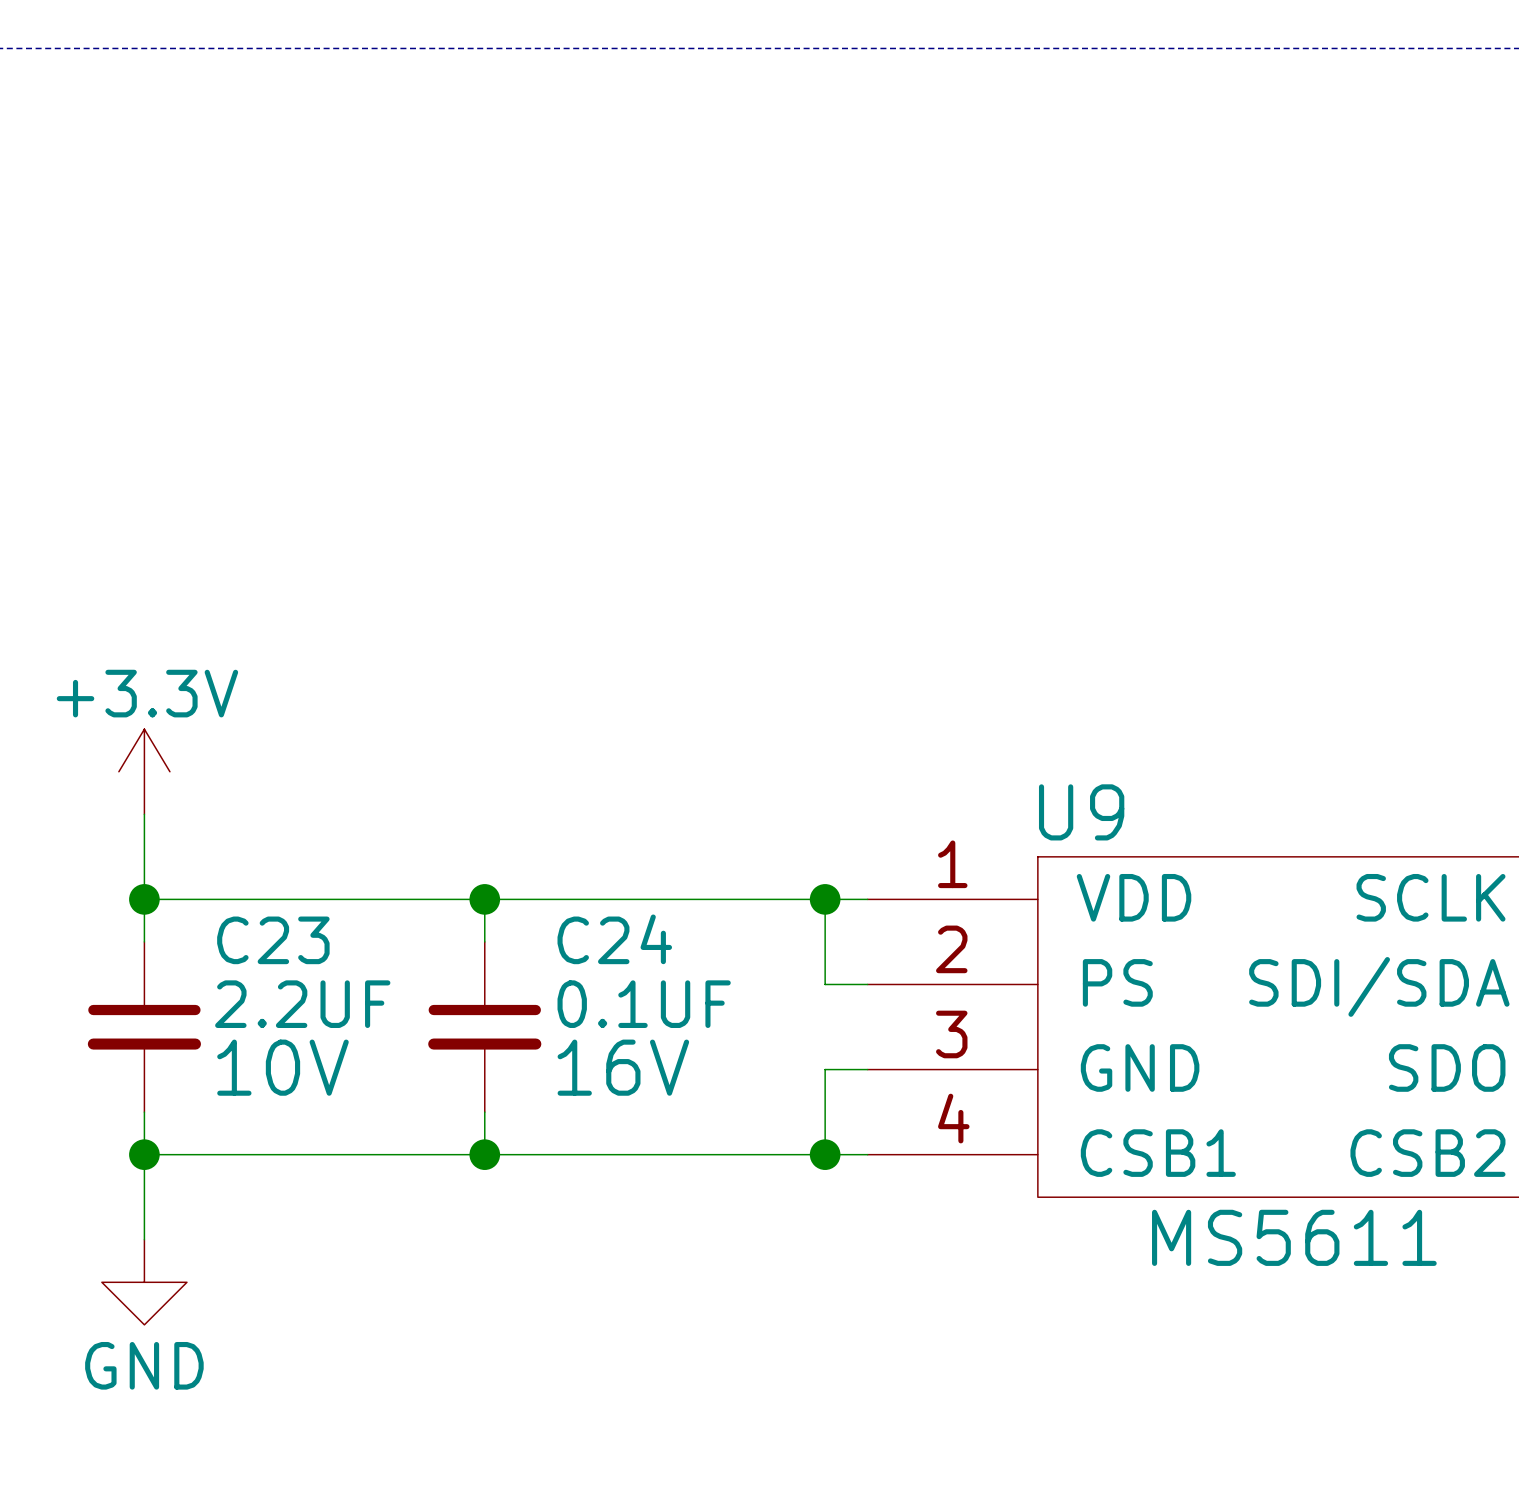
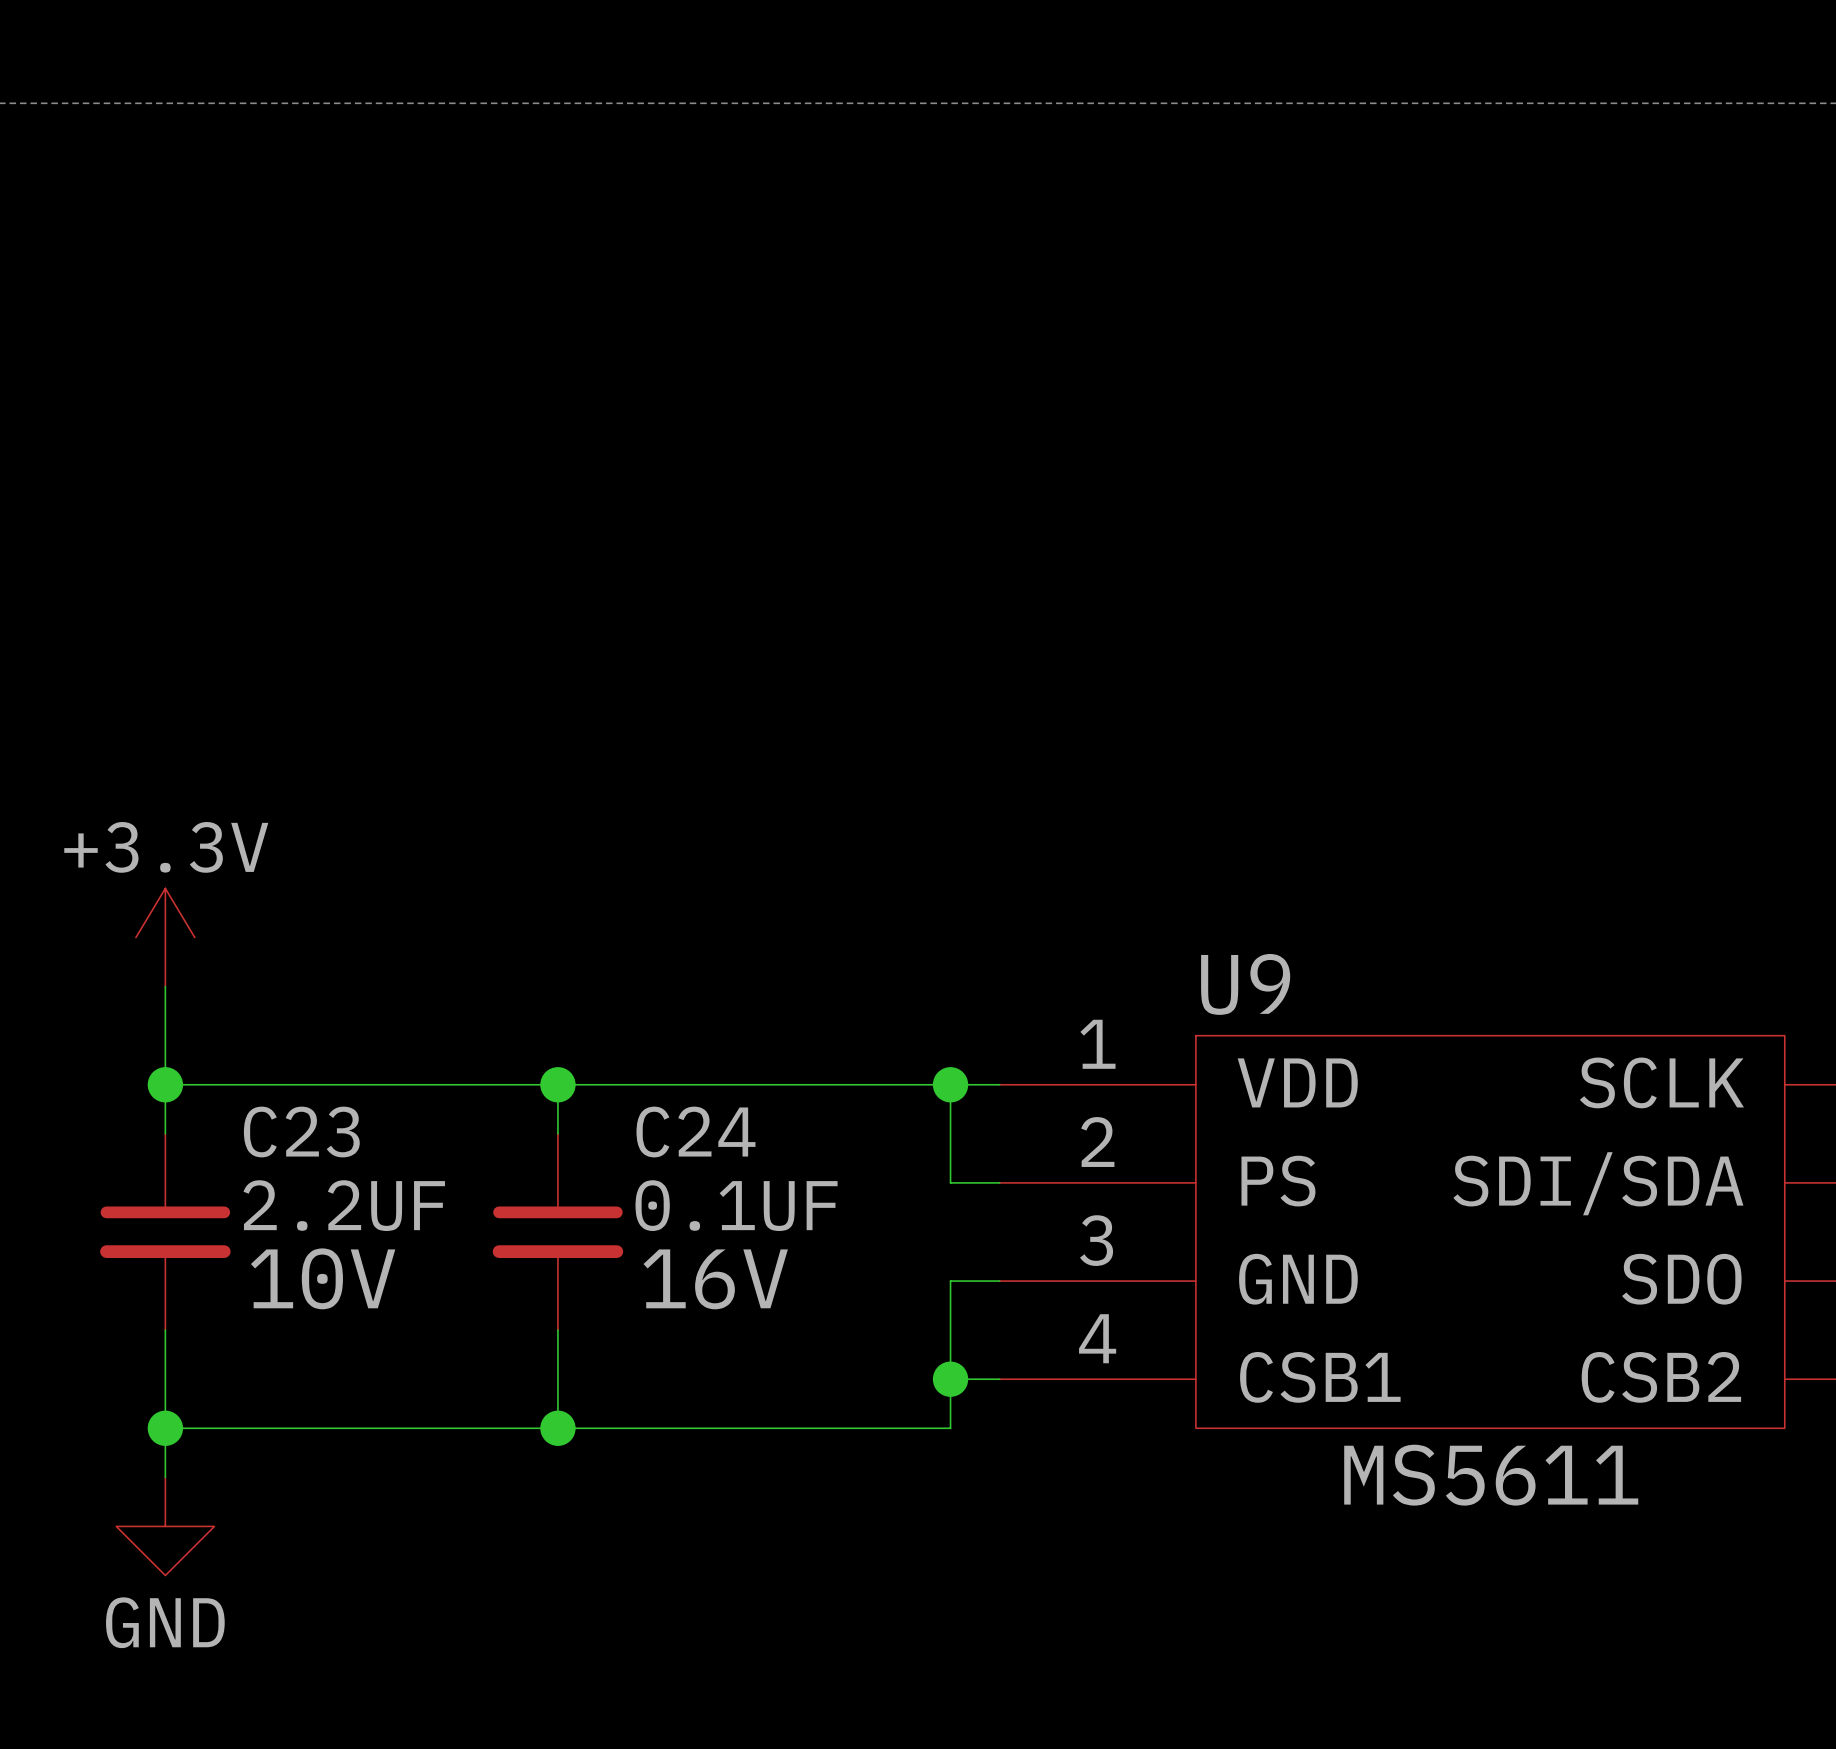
wire: (144, 1154) (825, 1154) -> (165, 1428) (950, 1428) (950, 1379)
junction position: (144, 1154) -> (165, 1428)
wire: none -> (557, 1379) (557, 1428)
junction position: (484, 1154) -> (557, 1428)

